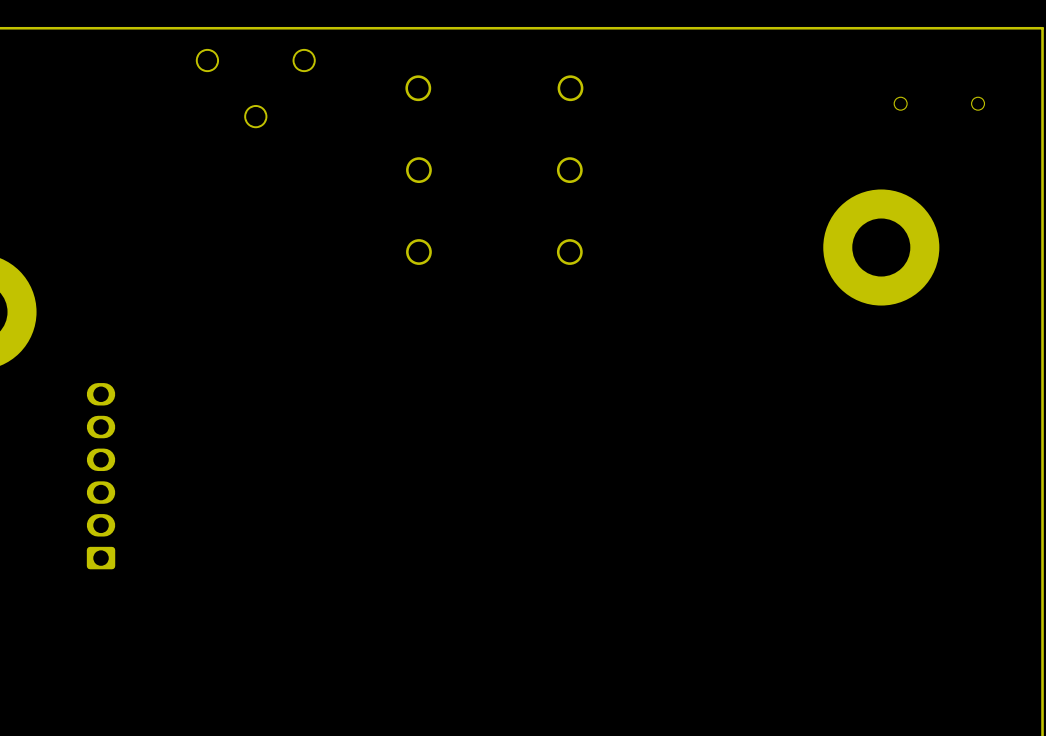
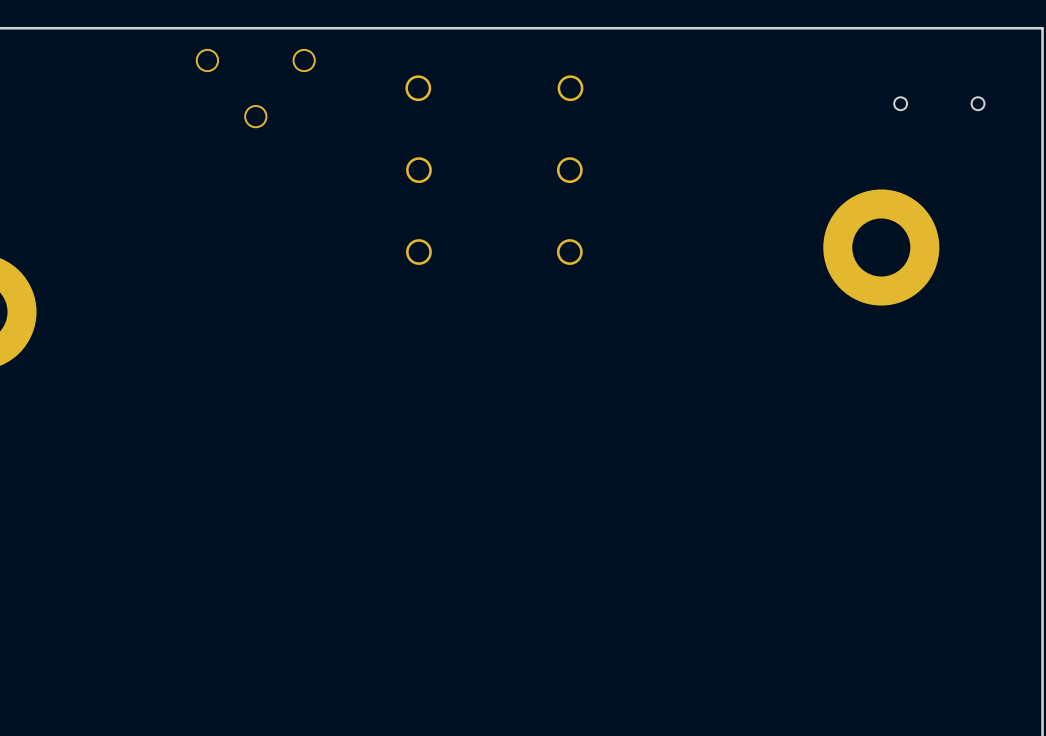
part: (101, 476) -> none

